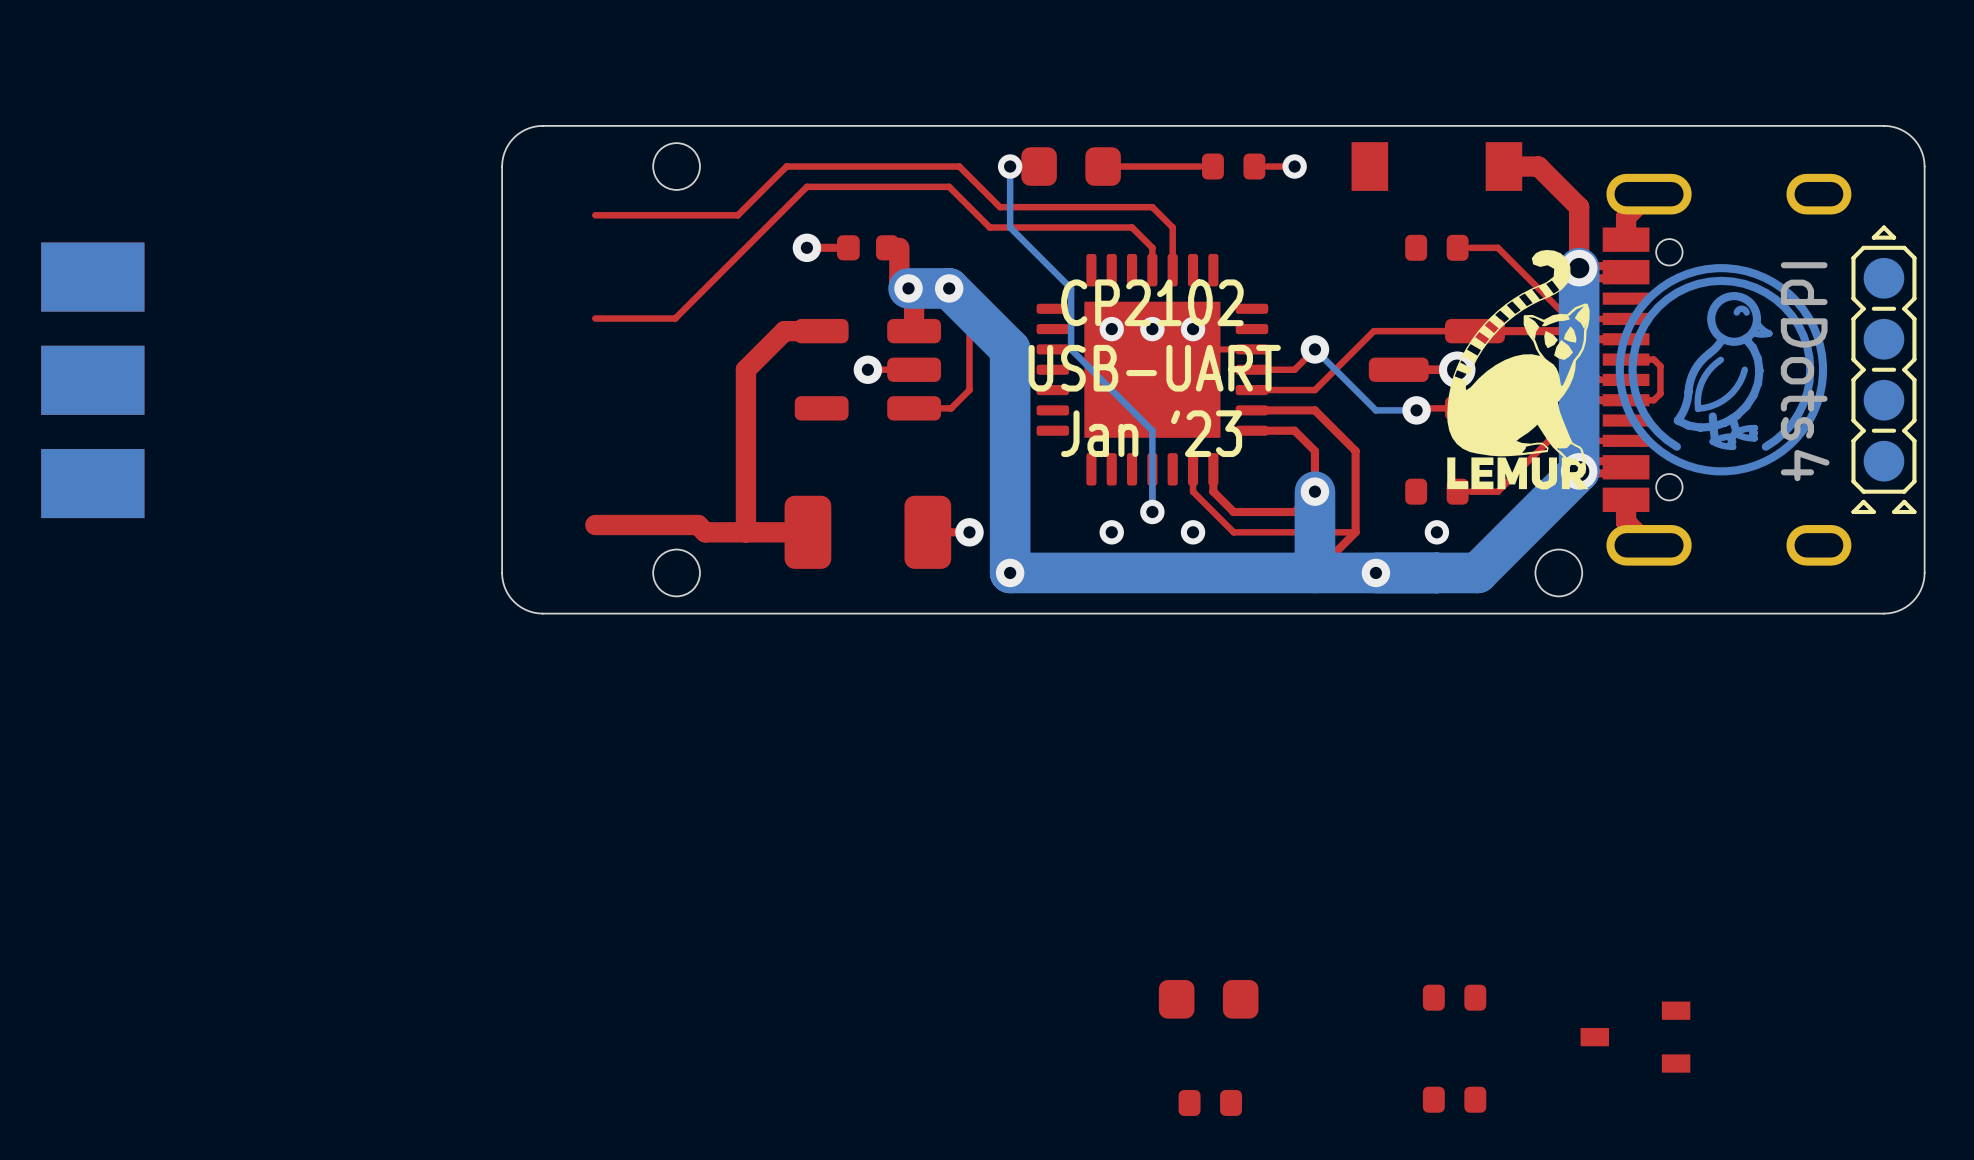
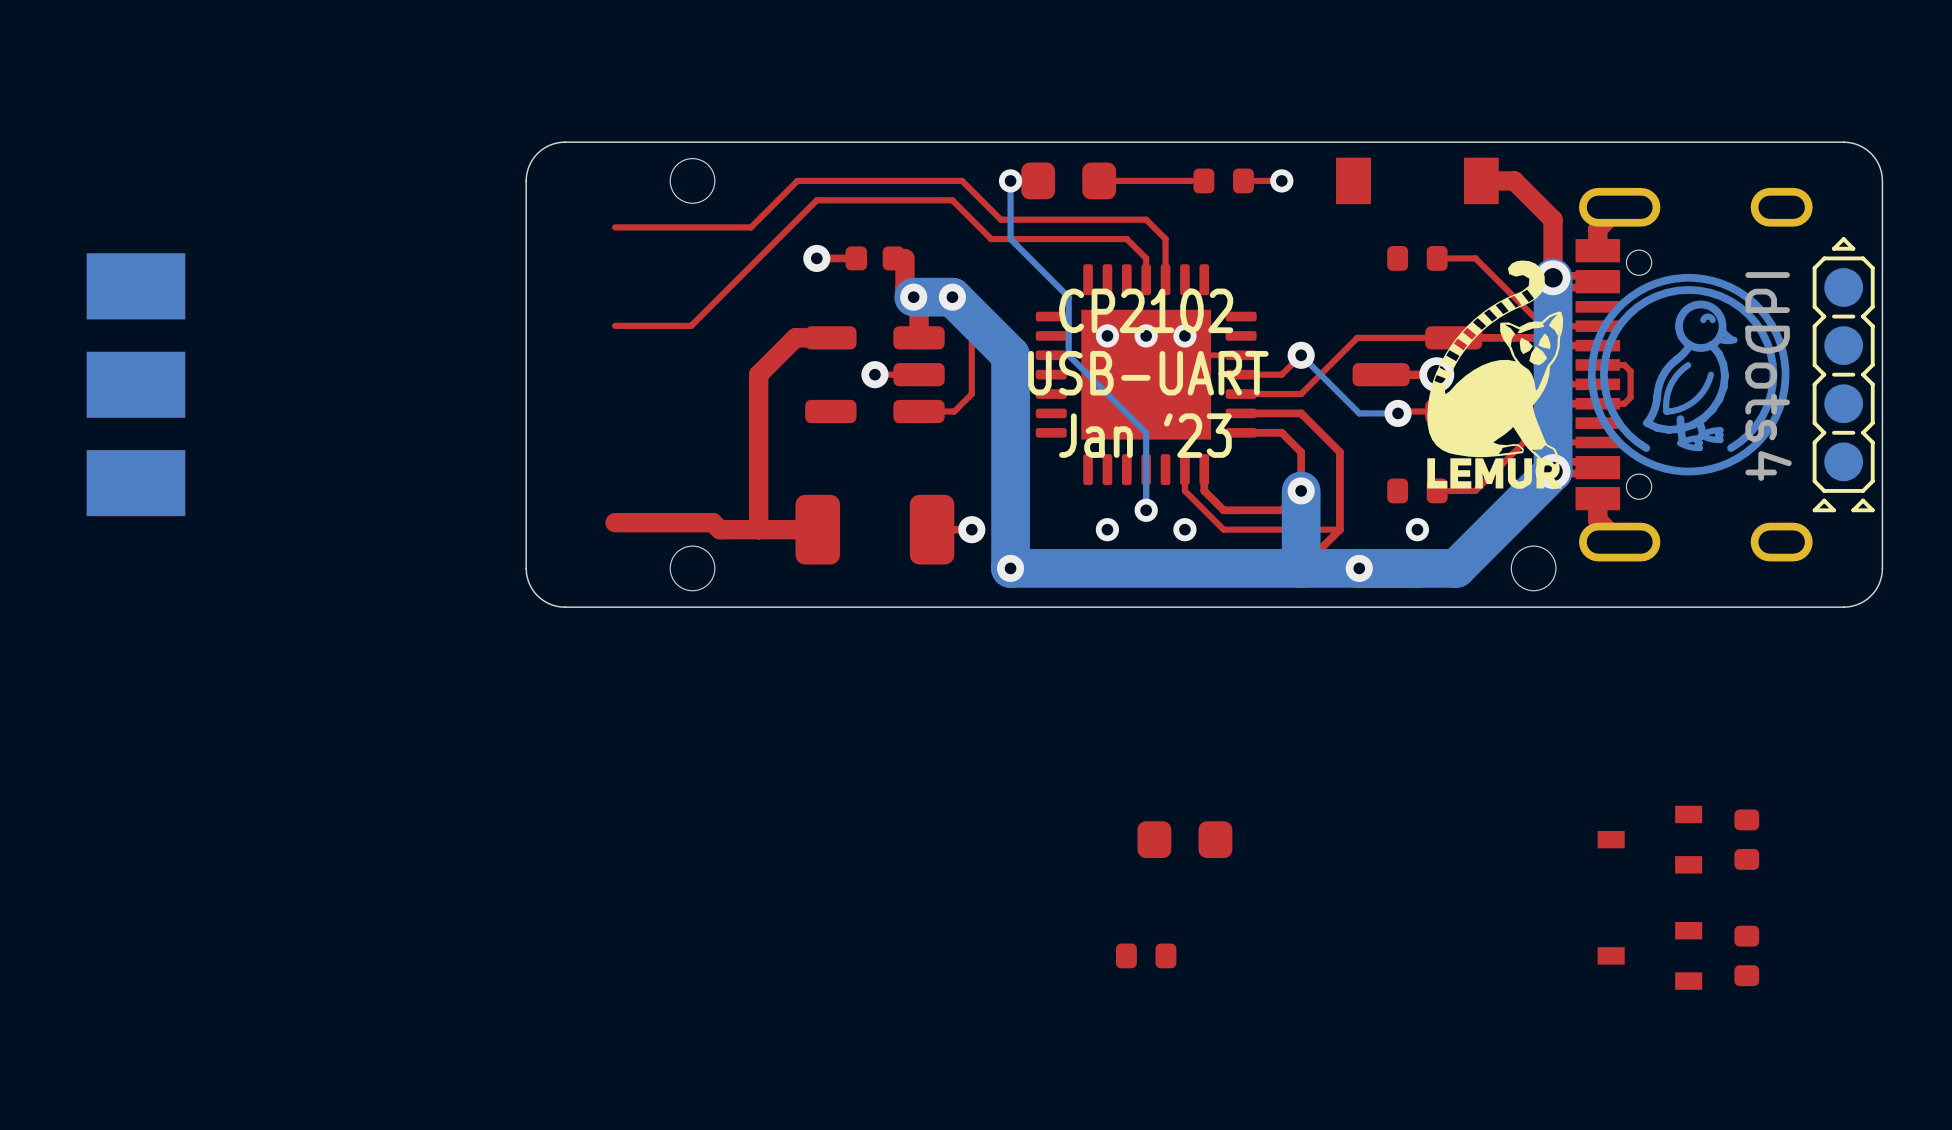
part: none -> (1649, 839)
part: none -> (1746, 839)
part: none -> (1746, 955)
part: (1454, 997) -> none
part position: (1208, 999) -> (1184, 839)
part position: (1635, 1037) -> (1649, 955)
part: (1454, 1099) -> none
part position: (1210, 1102) -> (1146, 955)

